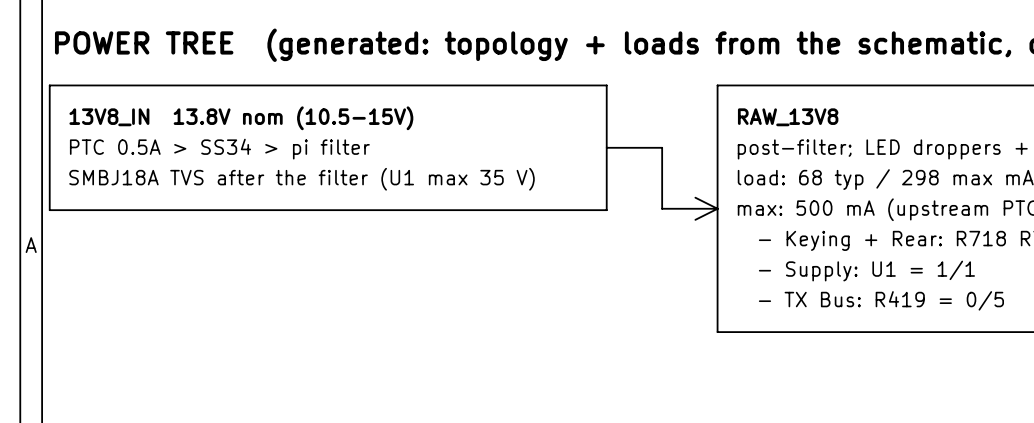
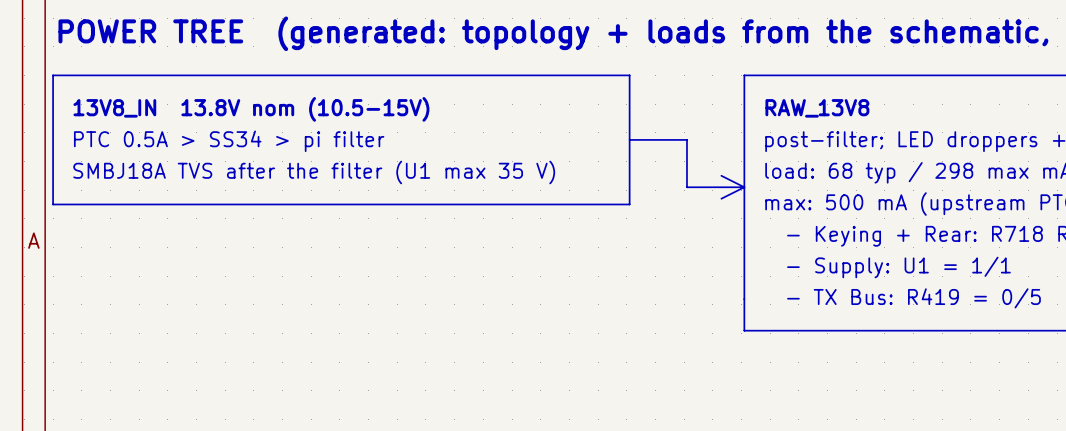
line: (662, 193) (662, 208) (717, 208) -> (686, 187) (744, 187)
line: (695, 197) (717, 208) -> (721, 175) (744, 187)
line: (717, 208) (695, 219) -> (744, 187) (721, 198)

